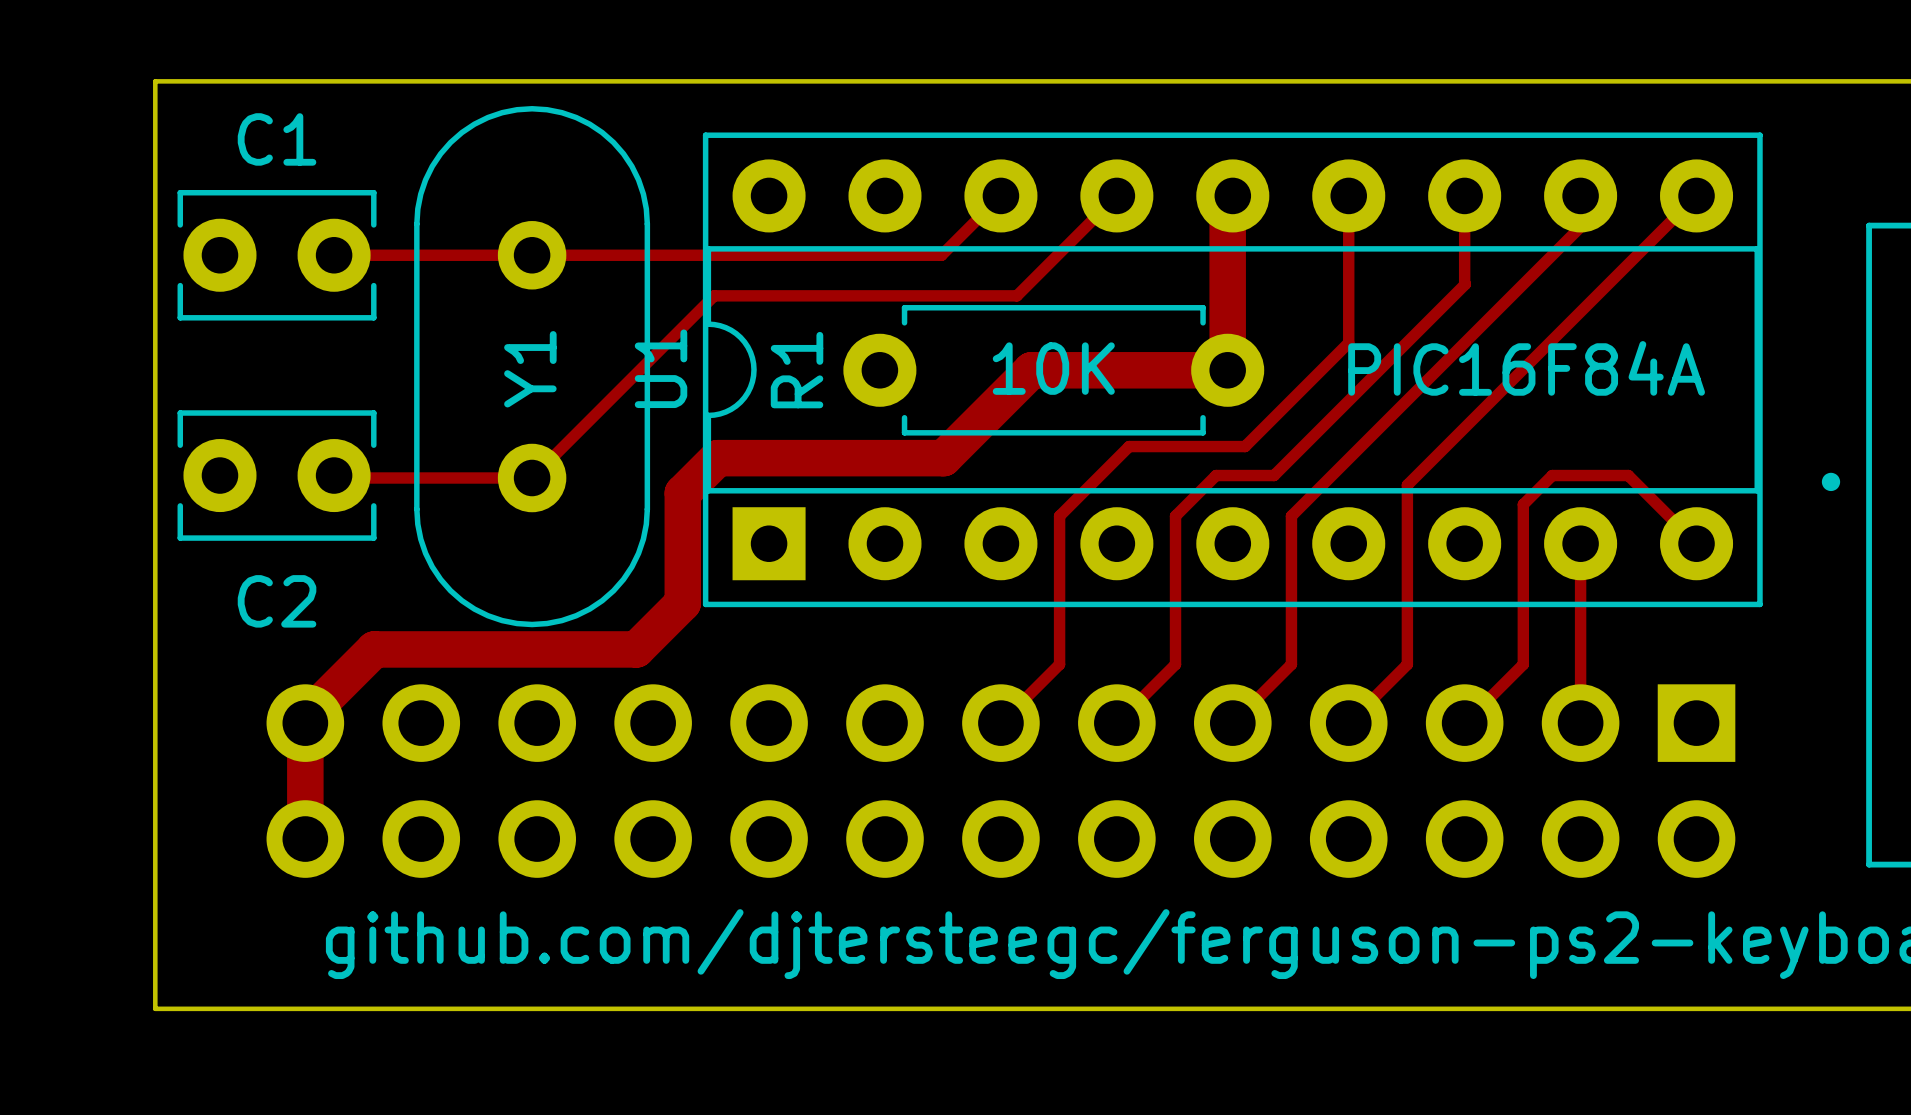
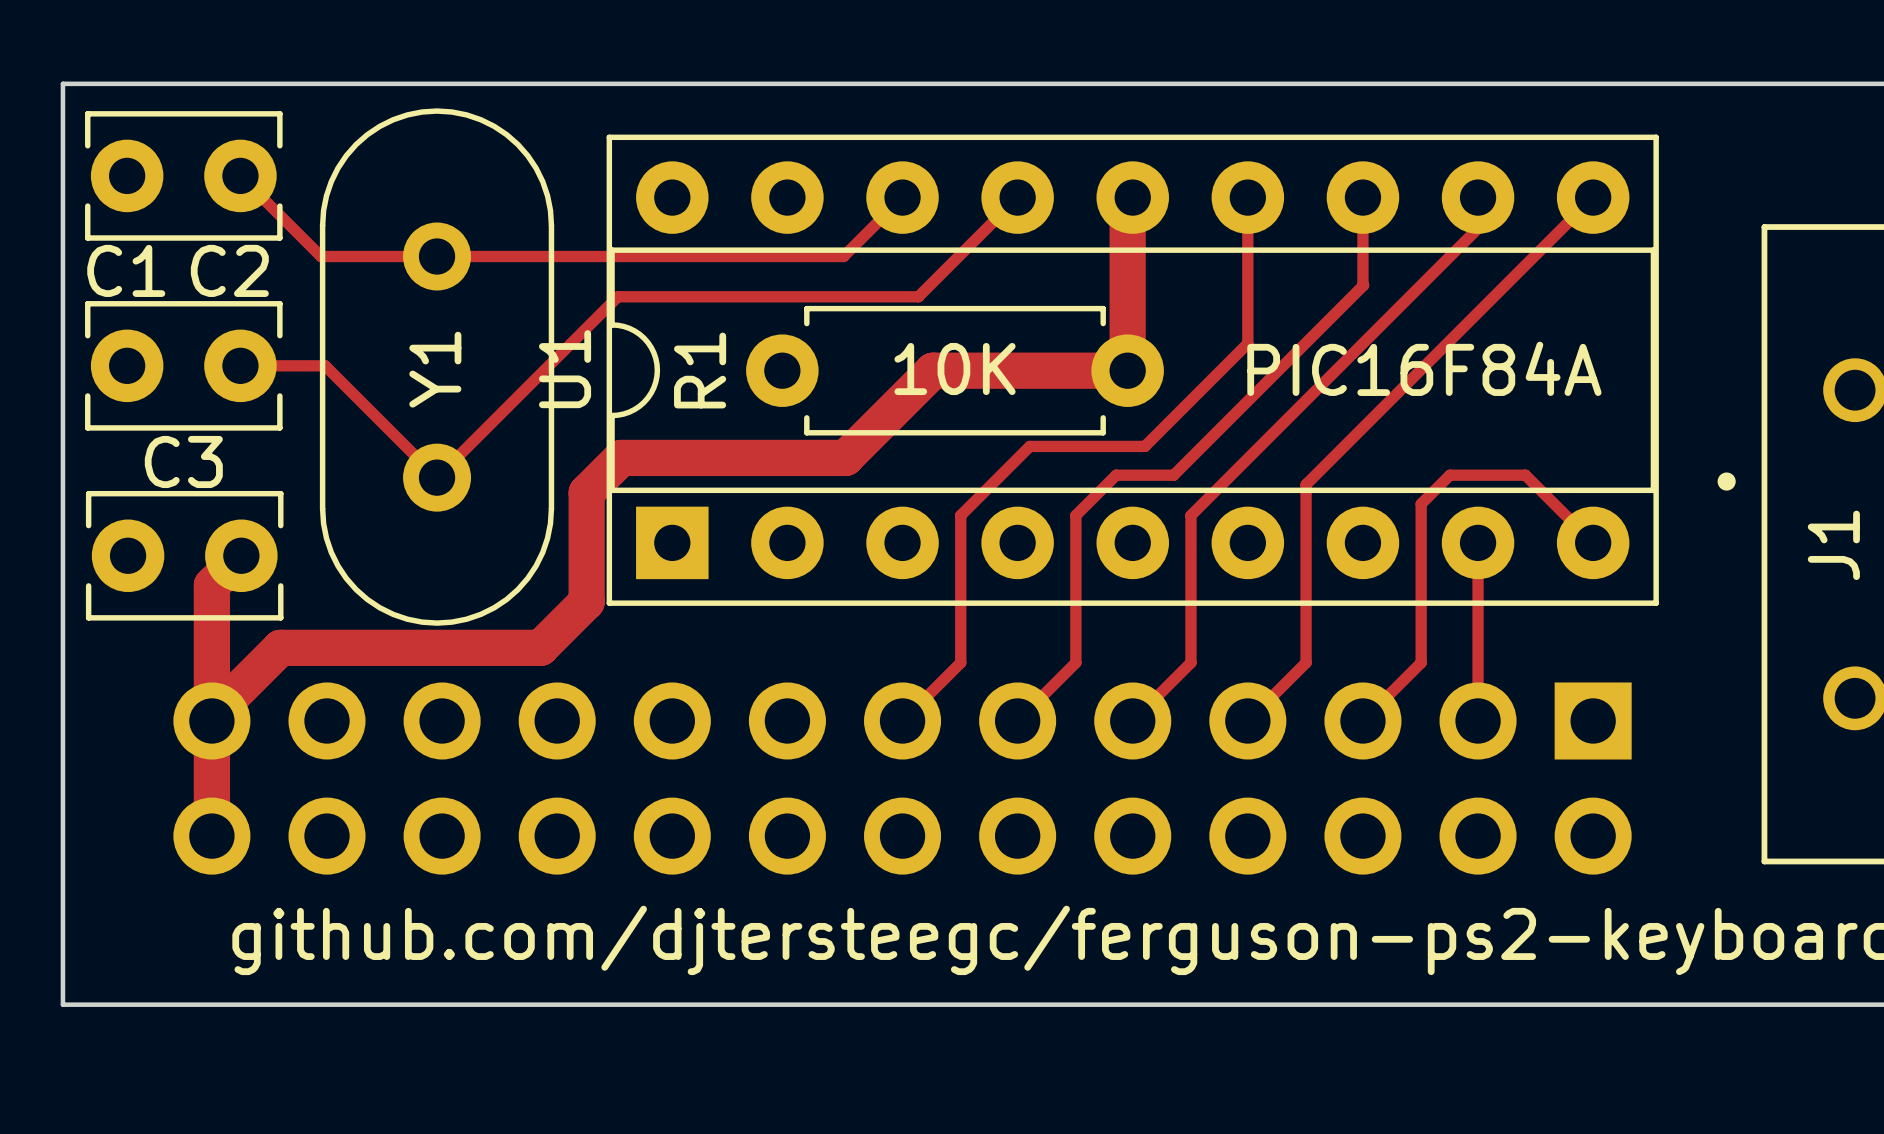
C1 name position: C1 (277, 139) -> C1 (126, 270)
C1 position: (277, 255) -> (183, 175)
track: (334, 255) (415, 255) -> (240, 175) (321, 256)
C2 position: (277, 475) -> (183, 365)
track: (334, 475) (336, 478) (532, 478) -> (240, 365) (325, 365) (437, 477)
C3: none -> (184, 555)
track: none -> (241, 555) (211, 585) (211, 716)
C2 name position: C2 (277, 601) -> C2 (229, 270)

